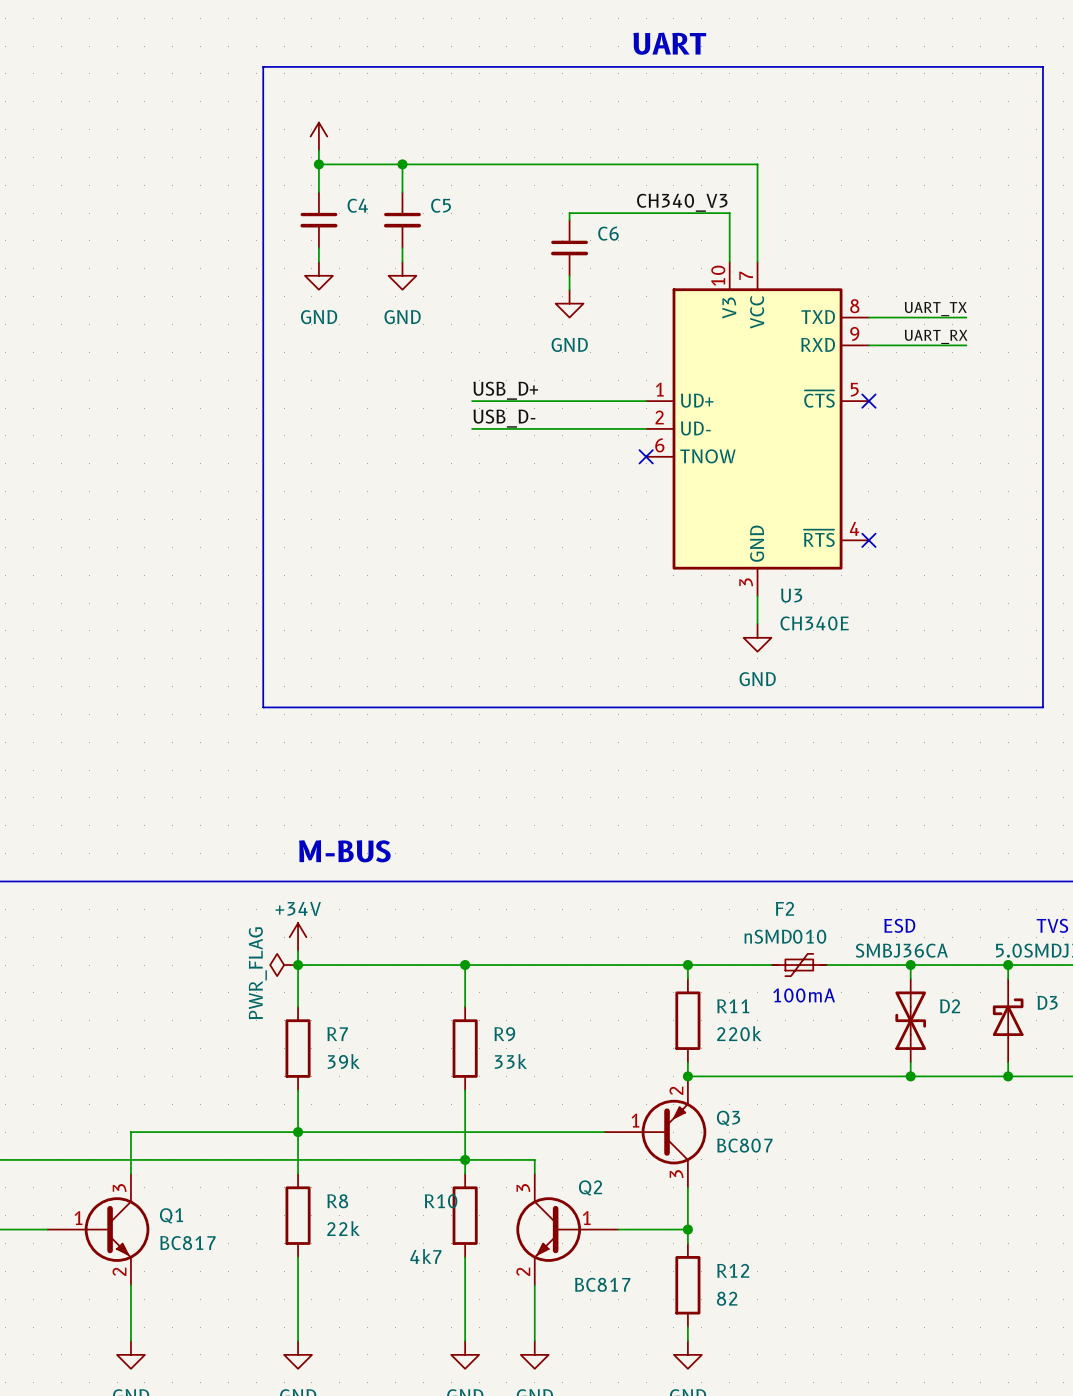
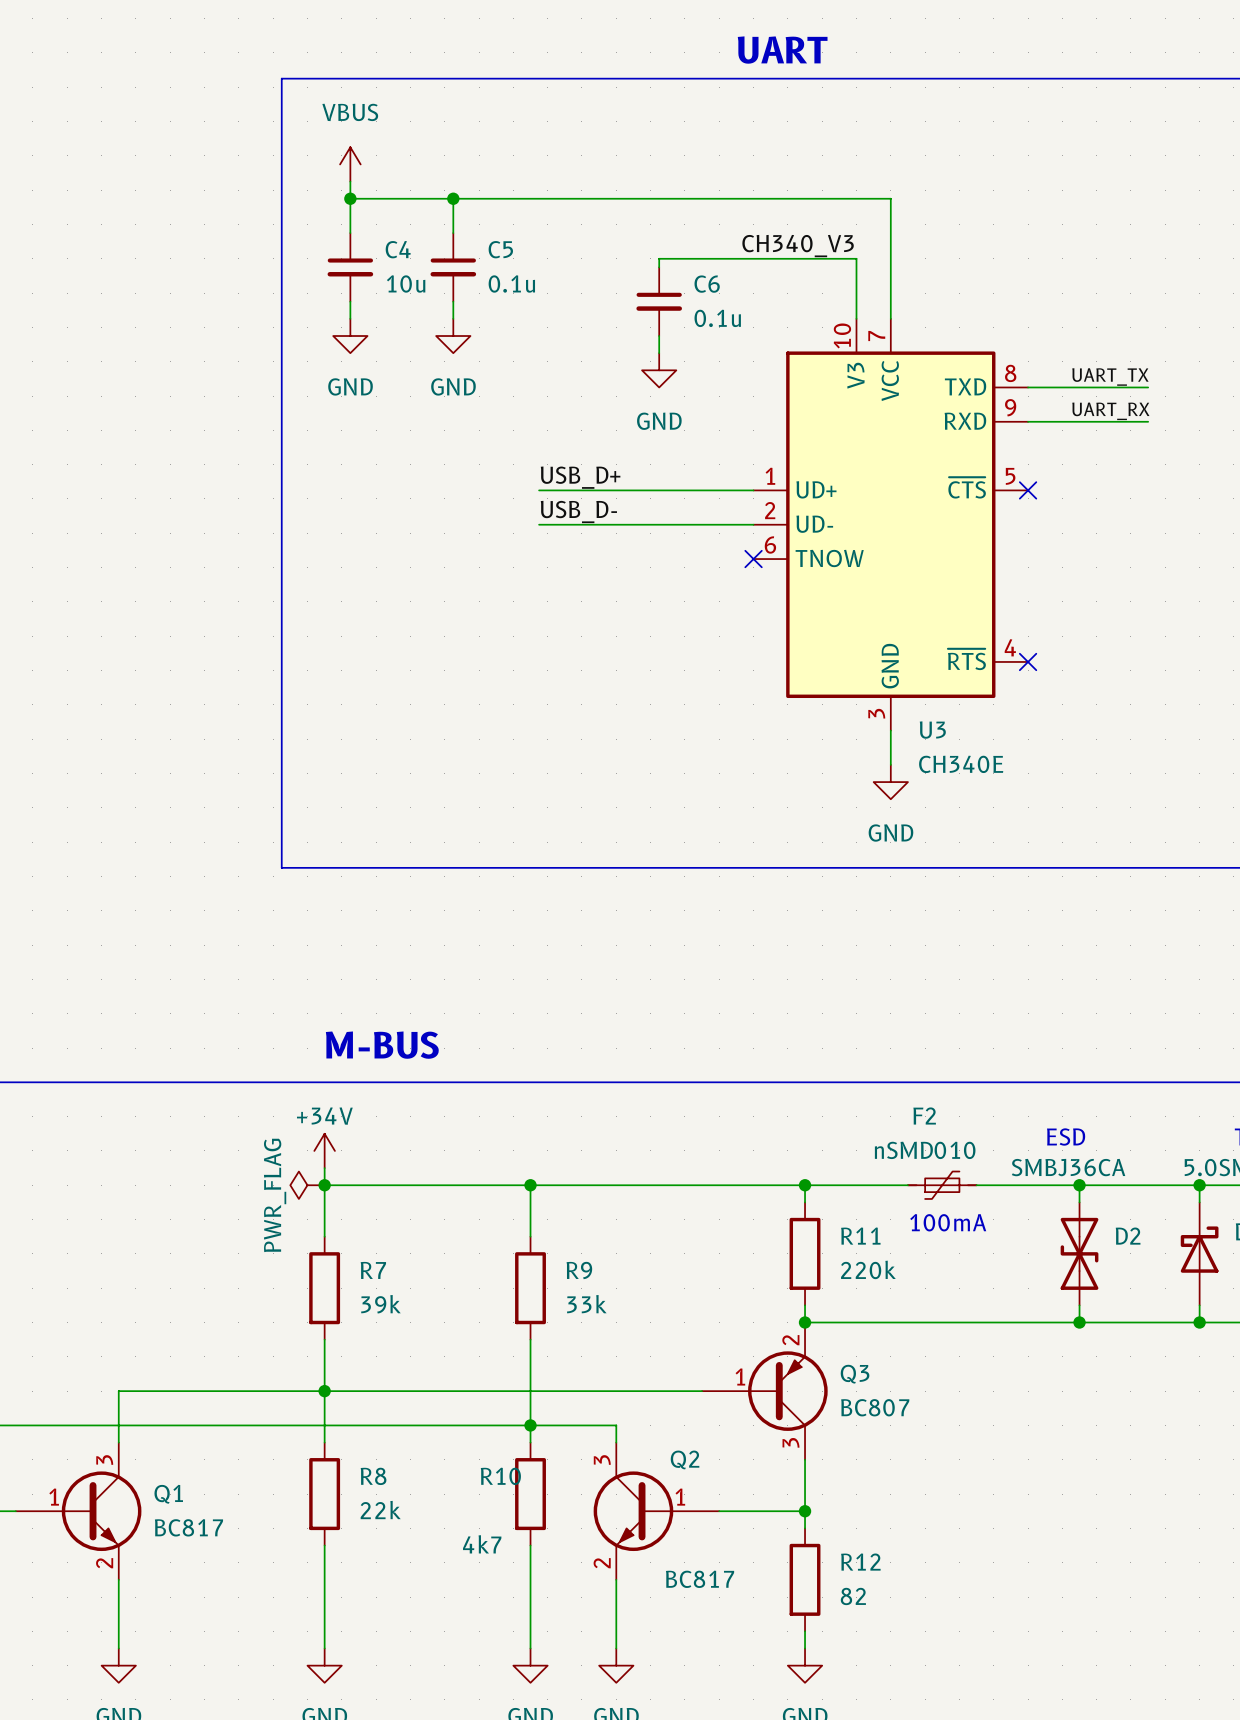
power symbol text: none -> VBUS (350, 112)
C4 value: none -> 10u (406, 283)
C5 value: none -> 0.1u (511, 283)
C6 value: none -> 0.1u (717, 318)

